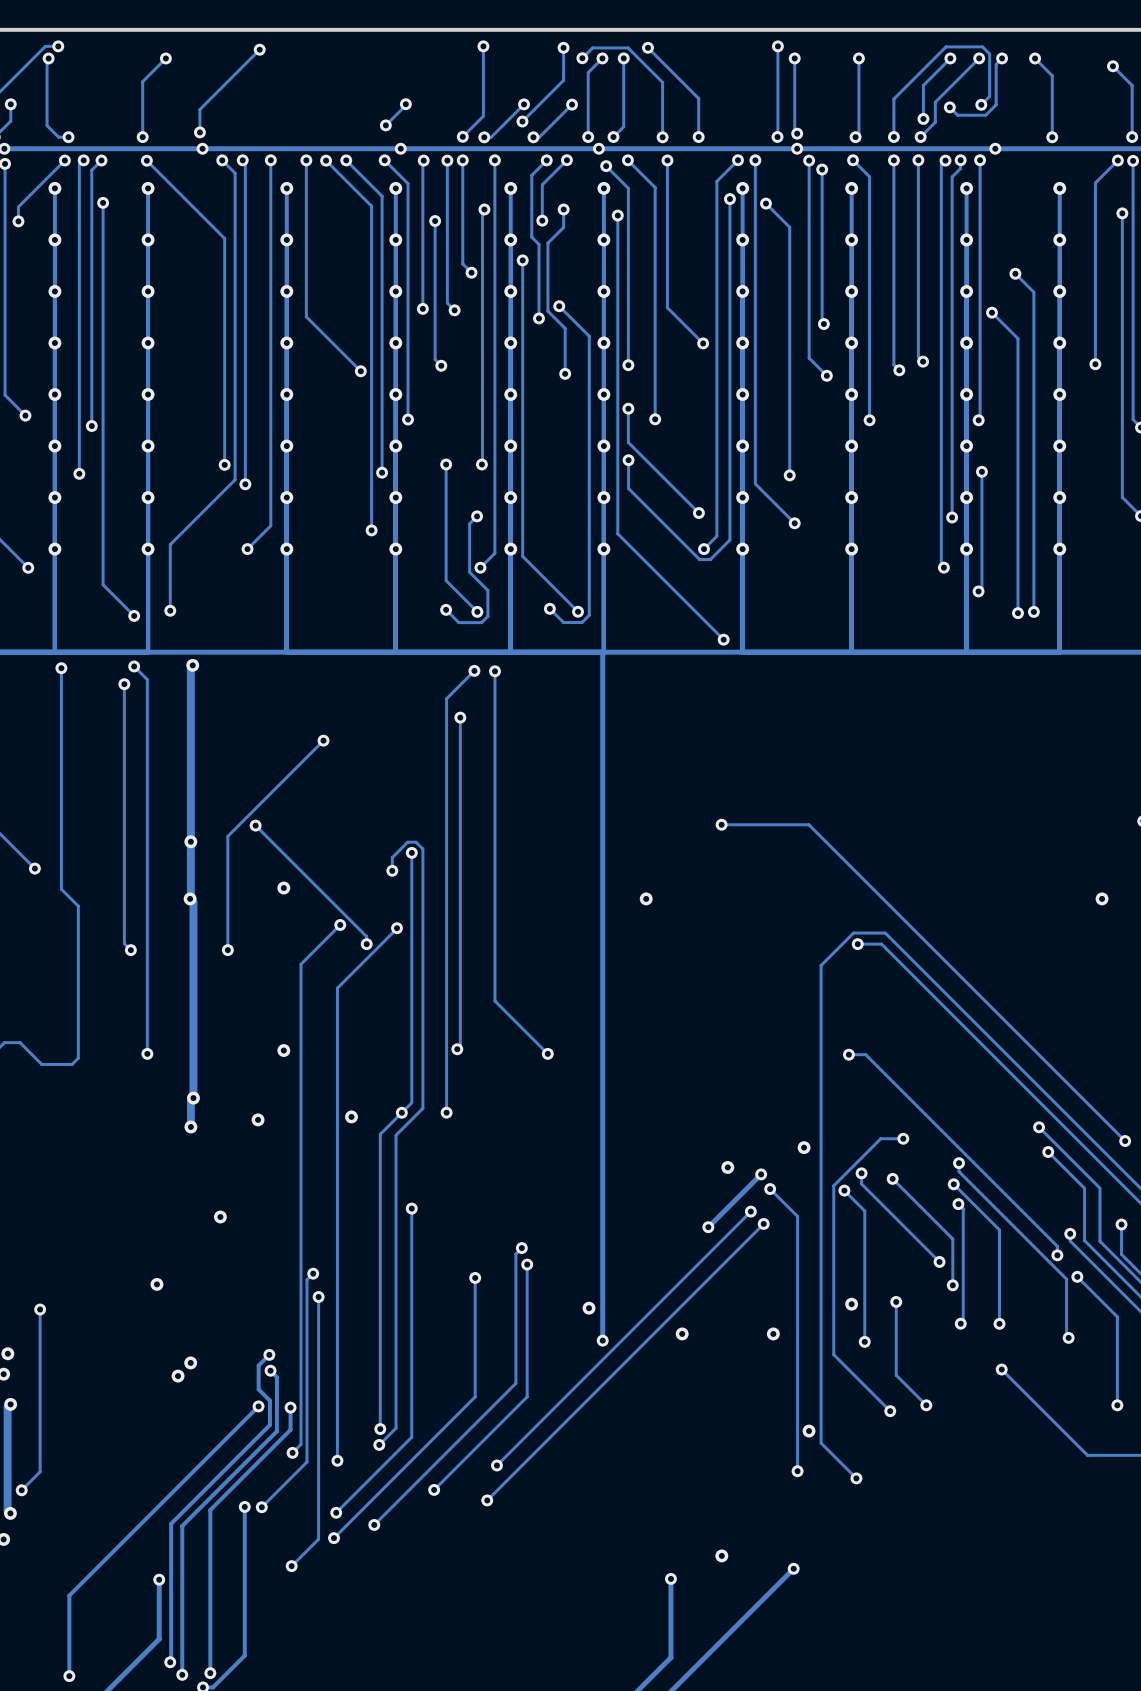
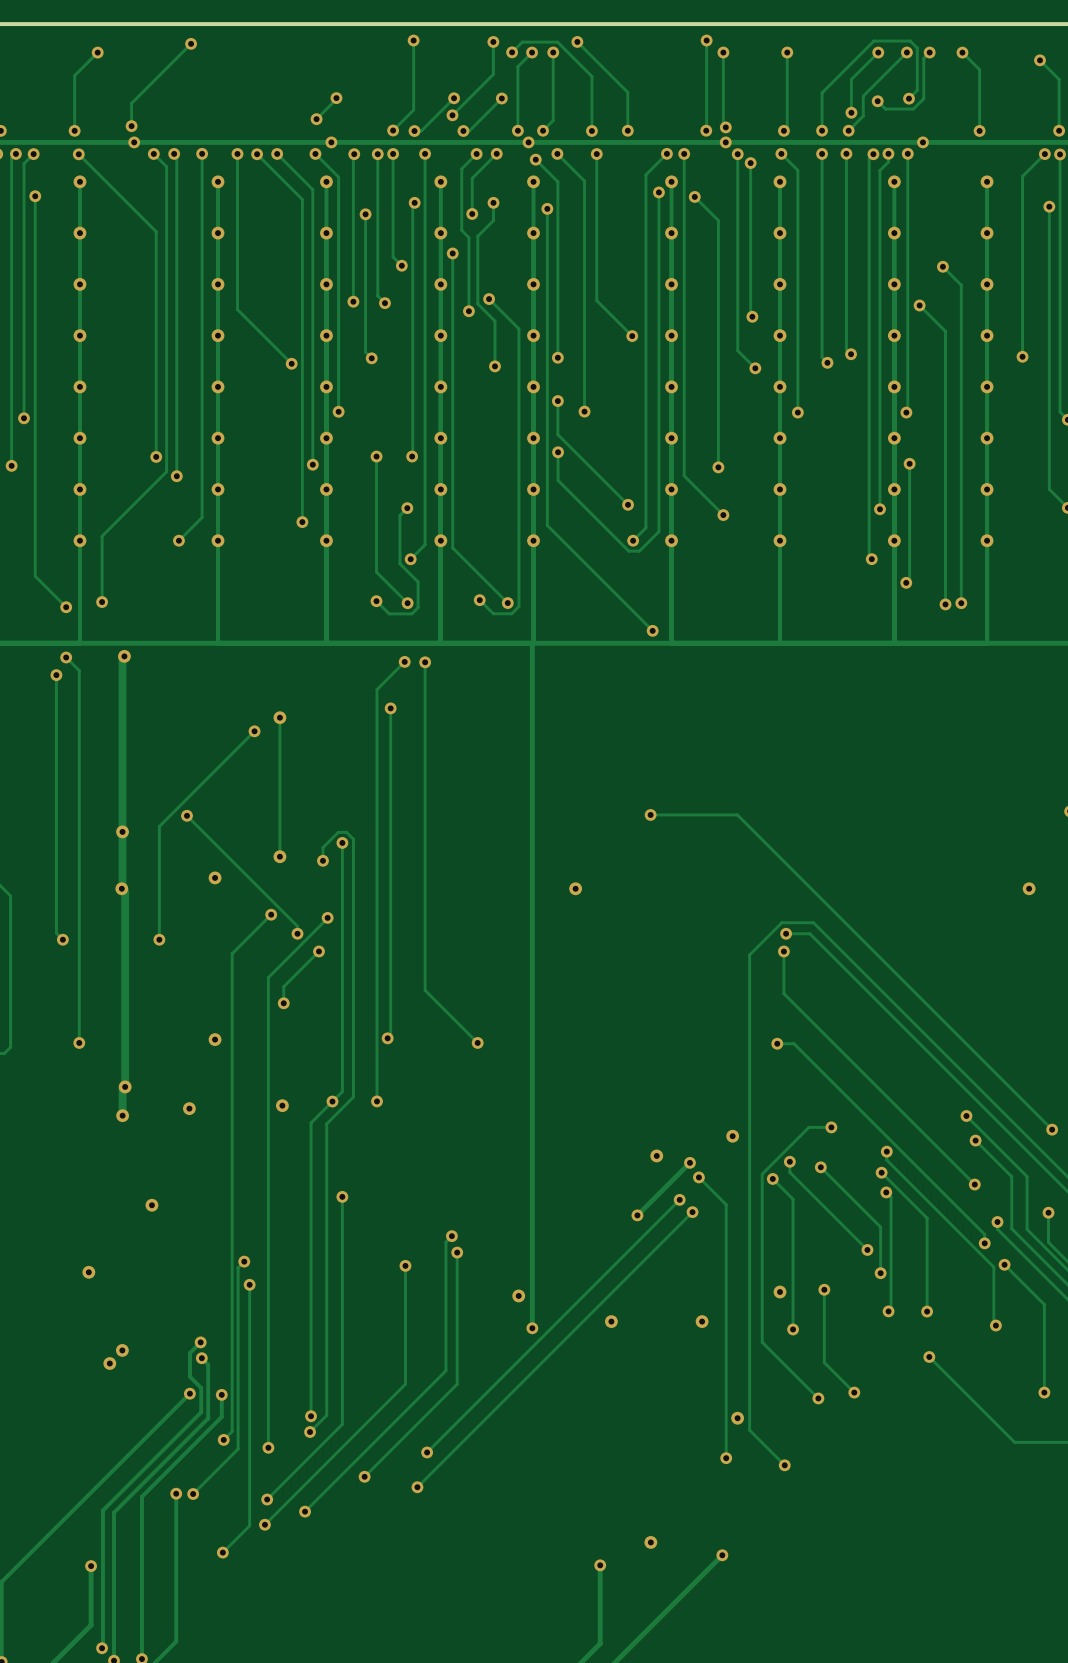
track: none -> (279, 717) (279, 856)
via: none -> (279, 717)
via: none -> (279, 856)
track: none -> (318, 951) (283, 986) (283, 1003)
via: none -> (318, 951)
track: none -> (783, 951) (783, 993) (974, 1184)
via: none -> (783, 951)
via: none -> (283, 1003)
via: none -> (974, 1184)

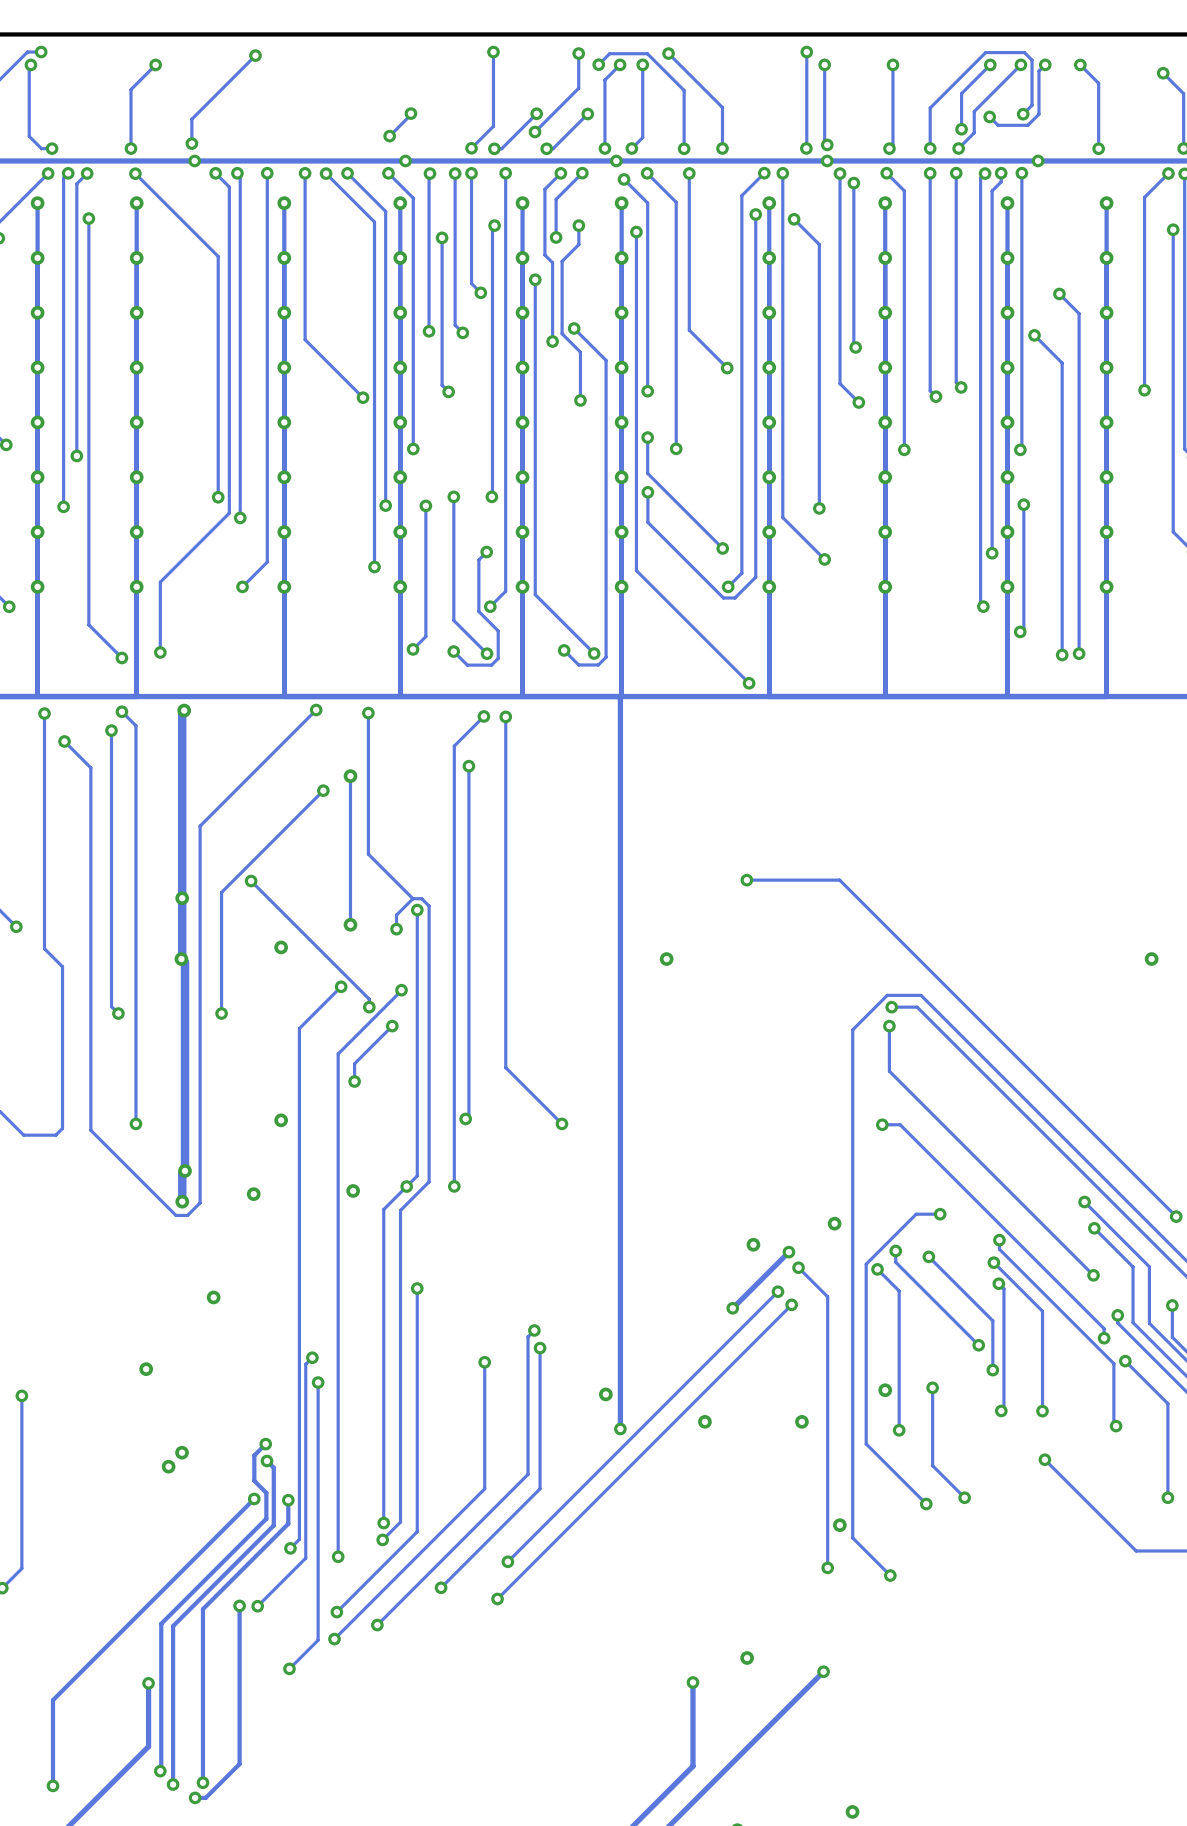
track: none -> (425, 505) (425, 636) (413, 649)
via: none -> (425, 505)
via: none -> (413, 649)
track: none -> (316, 710) (200, 826) (200, 1202) (187, 1215) (175, 1215) (90, 1130) (90, 767) (64, 741)
via: none -> (316, 710)
track: none -> (368, 713) (368, 854) (412, 898)
via: none -> (368, 713)
via: none -> (64, 741)

